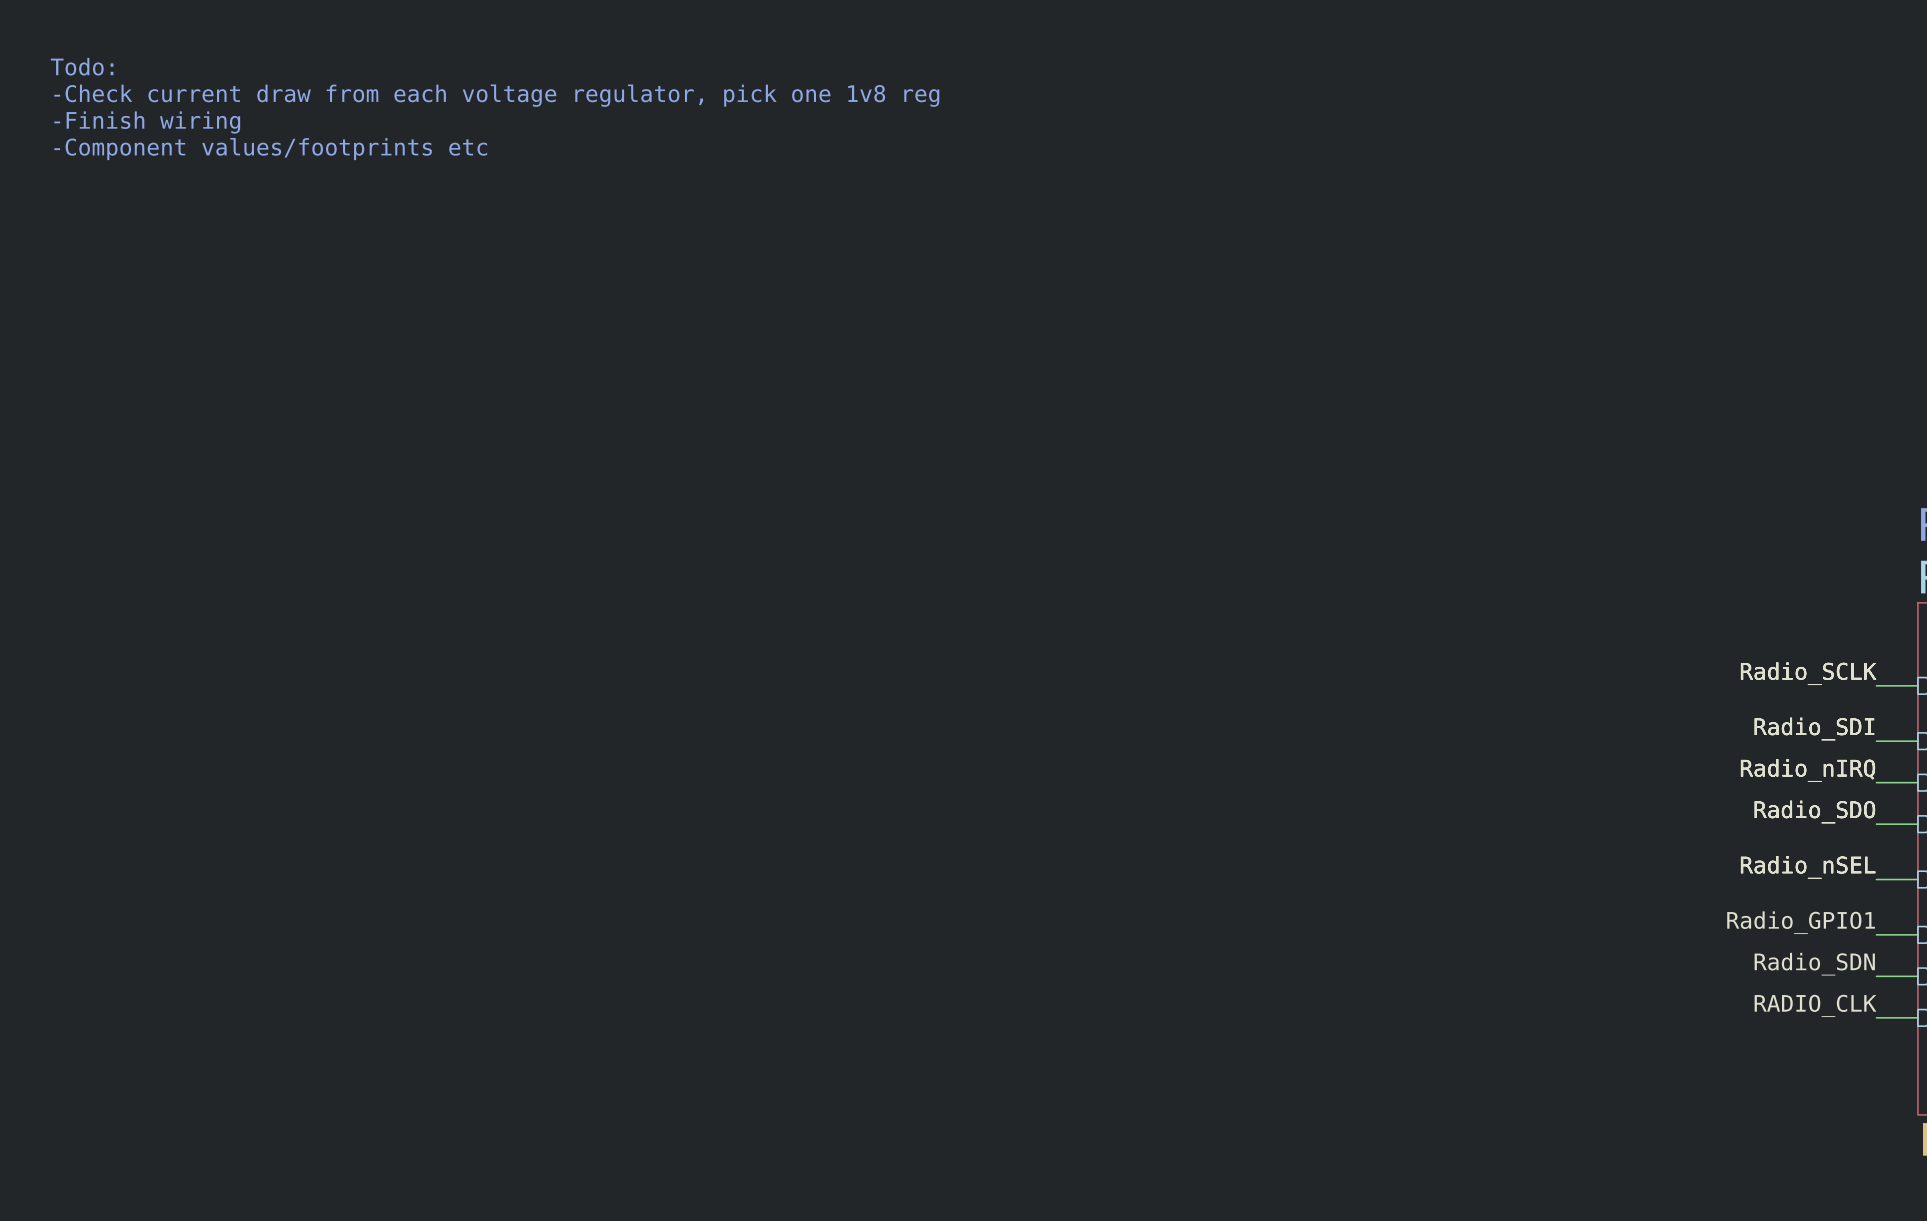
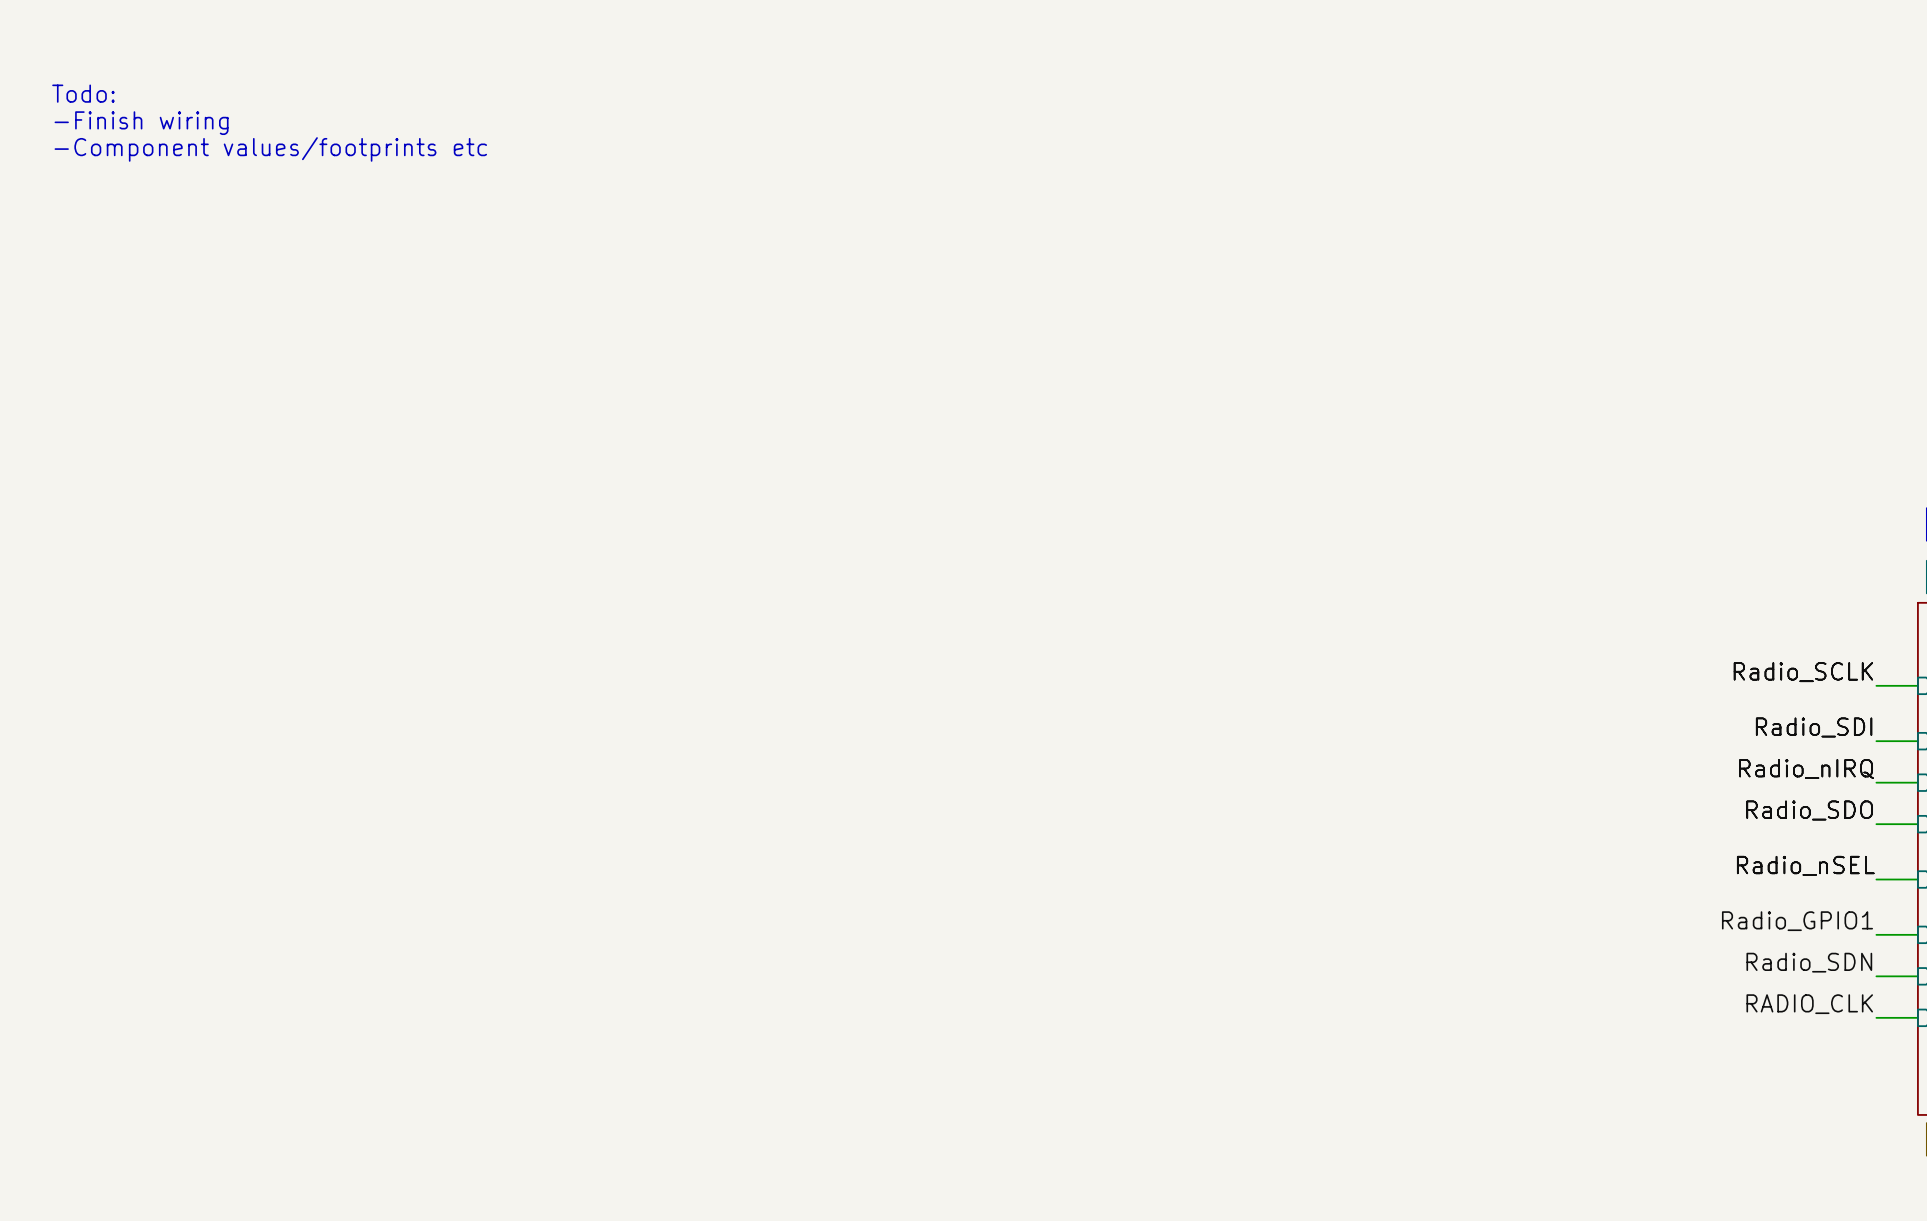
text: Todo: (82, 66) -> none
text: -Check current draw from each voltage regulator, pick one 1v8 reg (496, 95) -> Todo: (83, 93)

